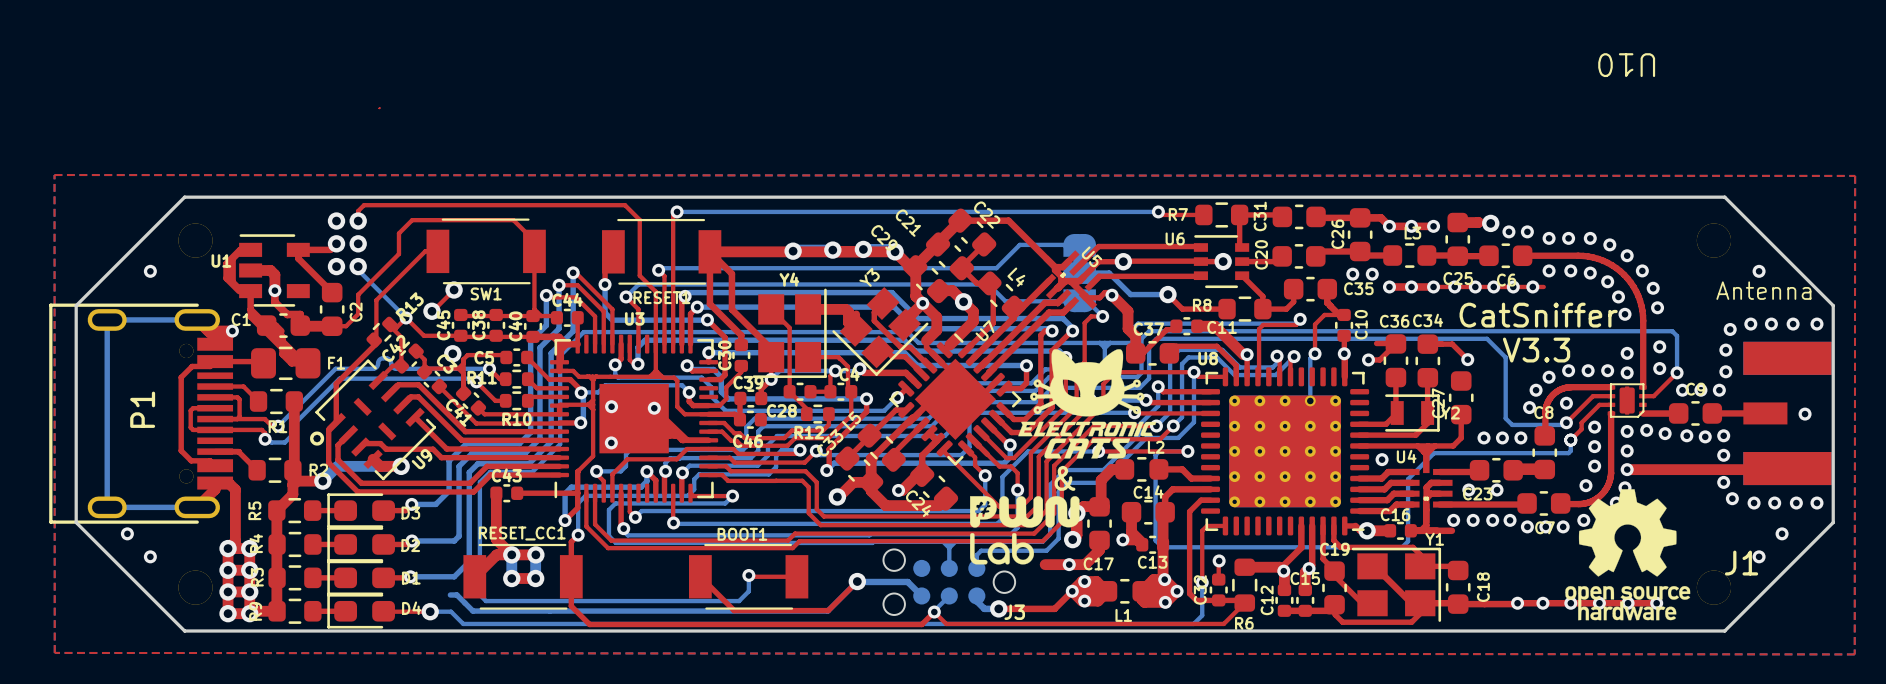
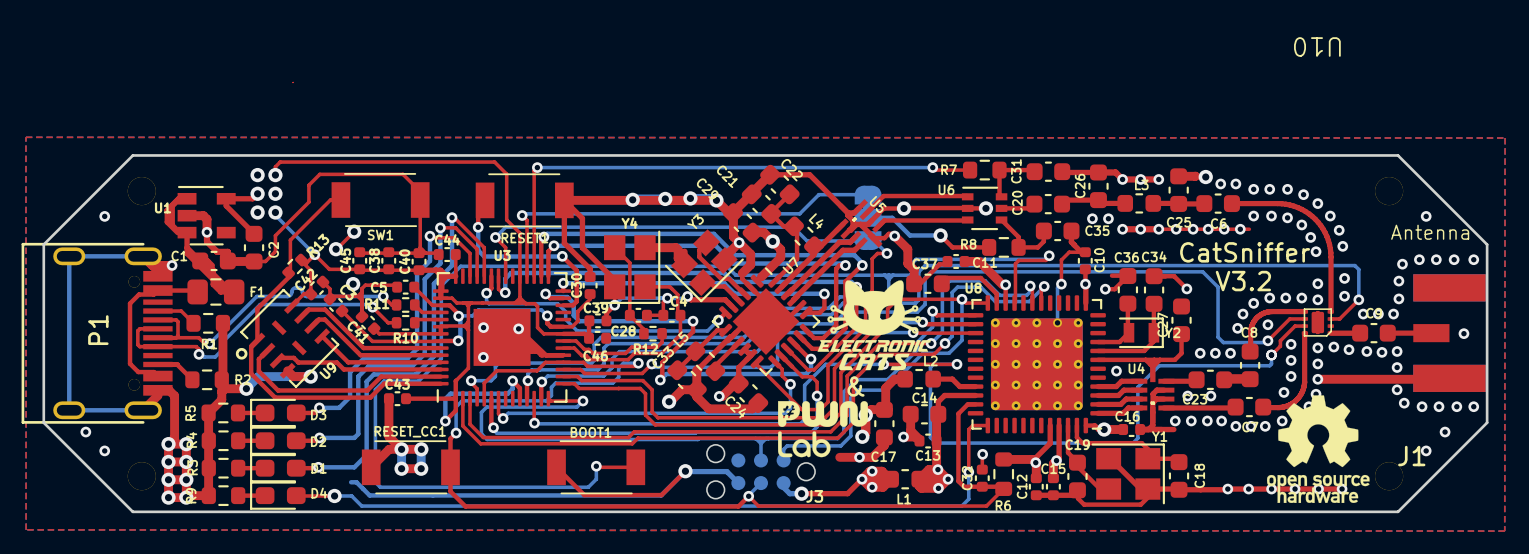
text: V3.3 (1536, 350) -> V3.2 (1243, 281)

